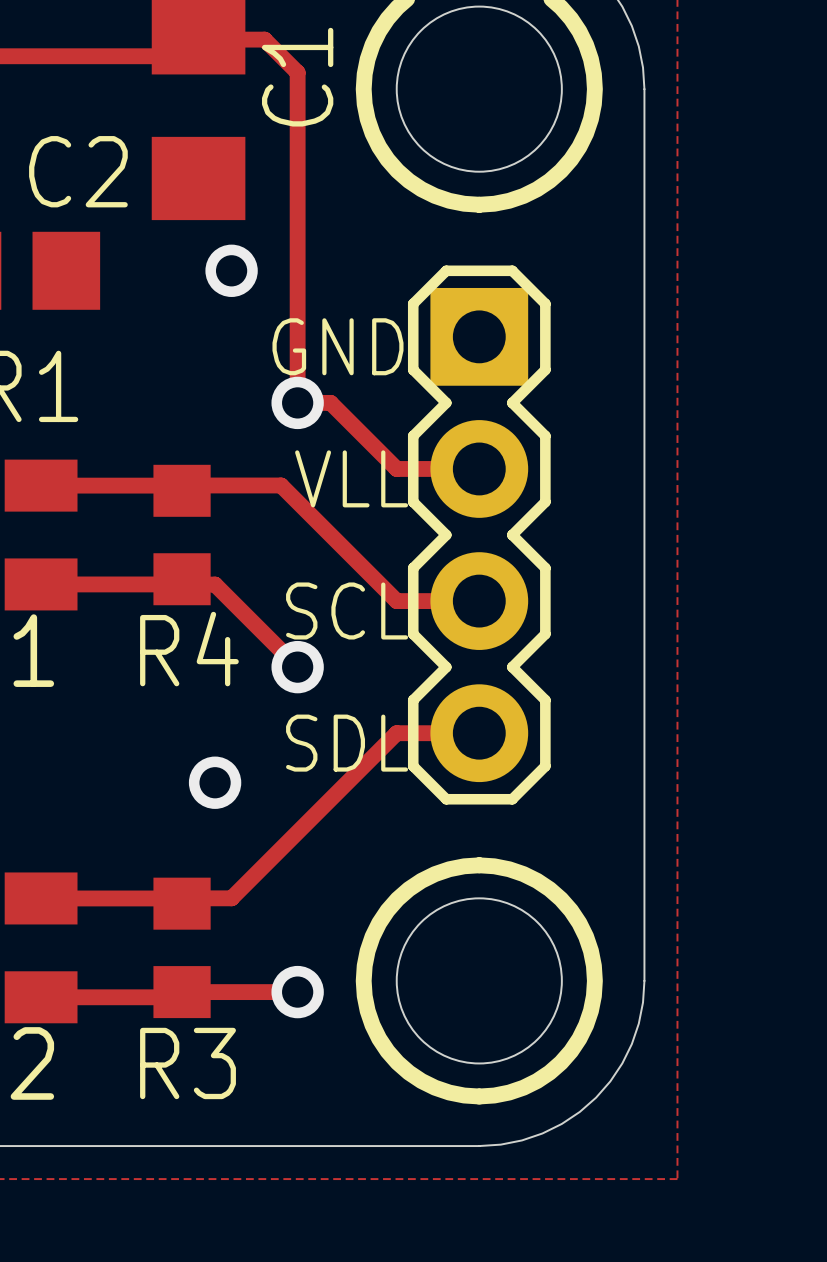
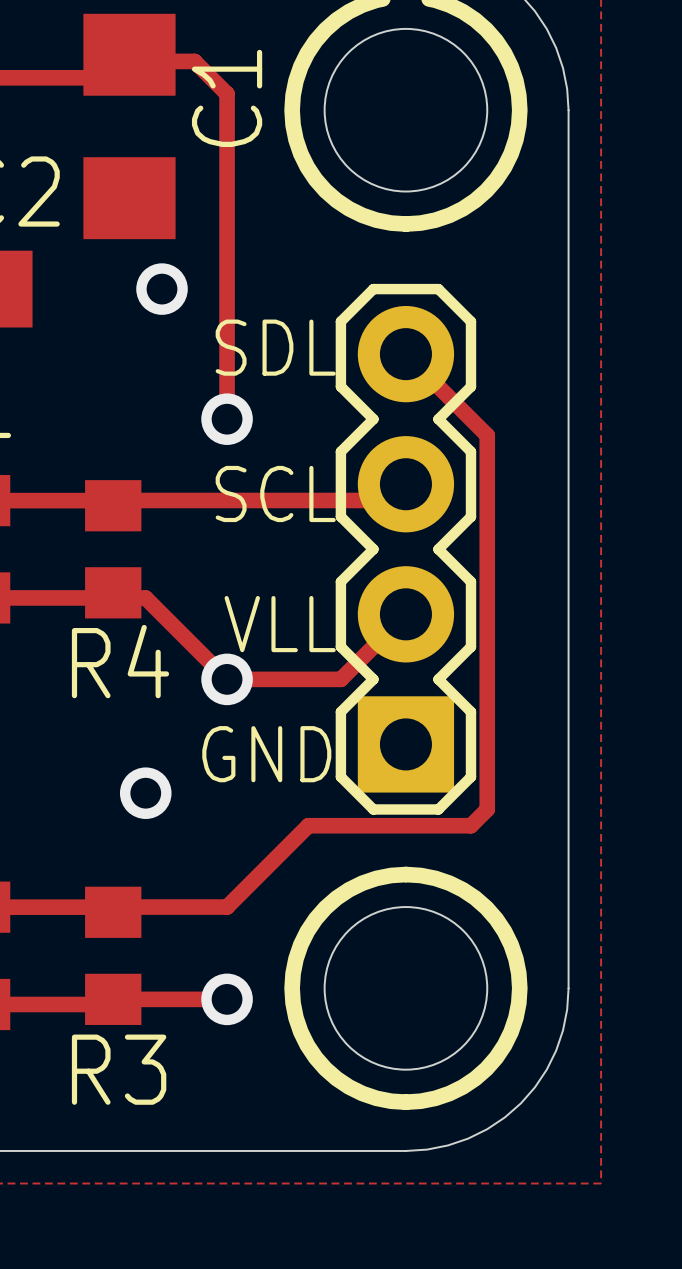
text: GND (337, 346) -> SDL (275, 347)
track: (297, 402) (330, 402) (396, 468) (479, 468) -> (210, 500) (389, 500) (405, 484)
text: VLL (351, 478) -> SCL (275, 493)
track: (281, 485) (396, 601) (479, 601) -> (227, 679) (340, 679) (405, 614)
part rotation: 0° (479, 535) -> 180° (405, 549)
text: SCL (347, 610) -> VLL (280, 624)
track: (479, 733) (396, 733) (231, 898) -> (405, 354) (487, 435) (487, 809) (470, 825) (308, 825) (227, 907) (162, 907)
text: SDL (347, 743) -> GND (266, 754)

